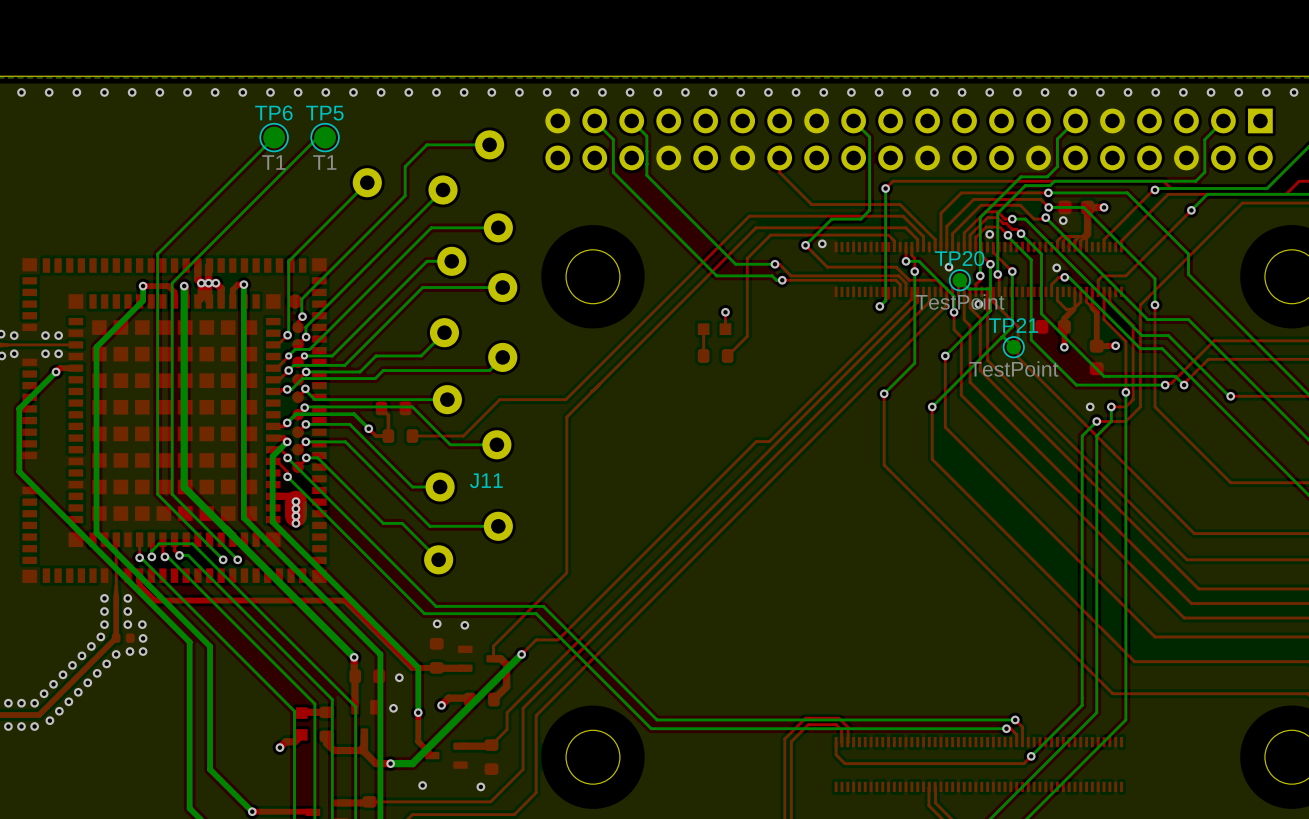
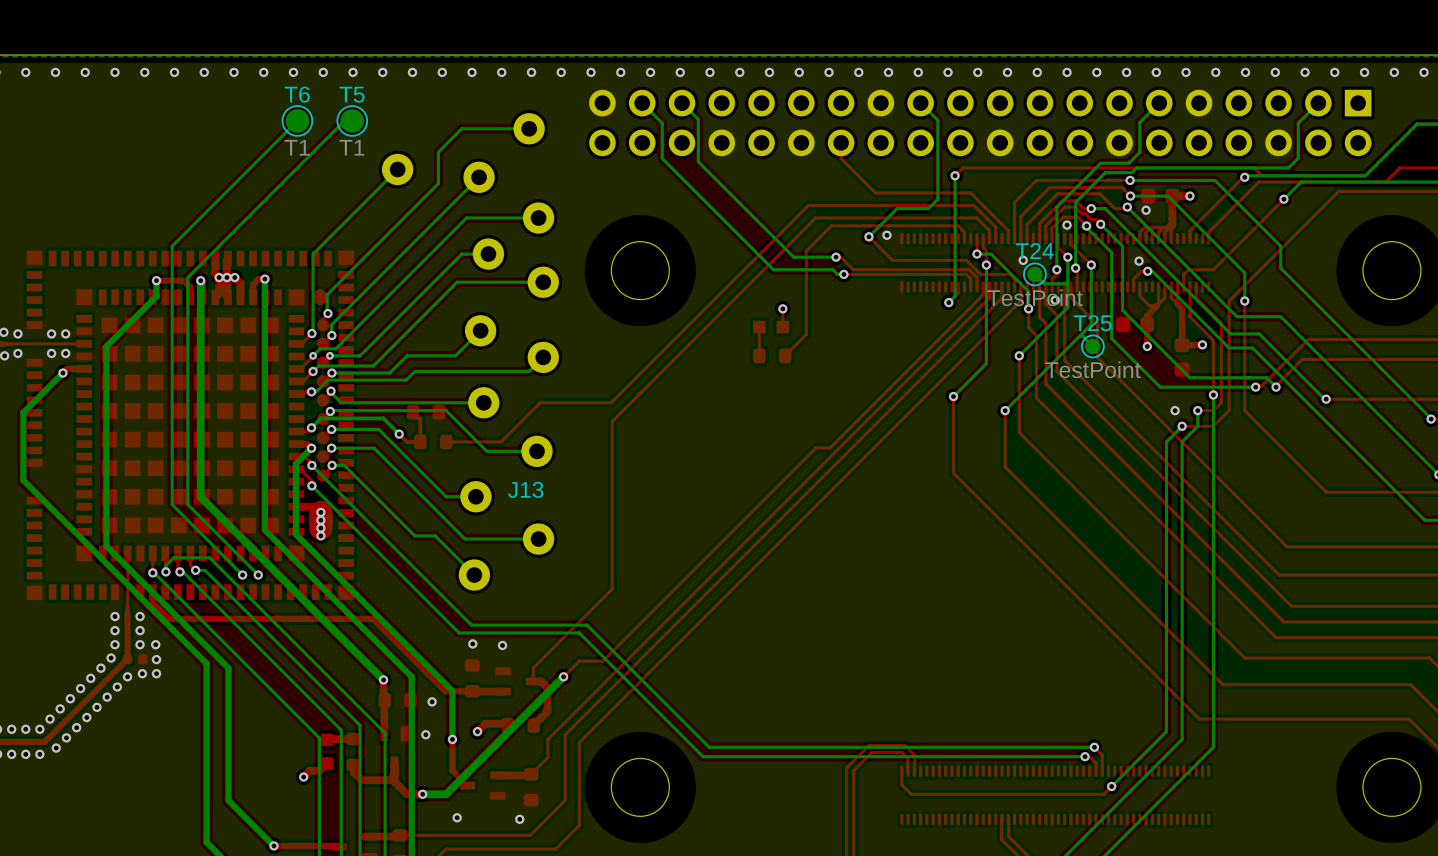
TP6 name: TP6 (273, 113) -> T6 (297, 94)
TP5 name: TP5 (324, 113) -> T5 (352, 94)
TP20 name: TP20 (959, 258) -> T24 (1034, 251)
TP21 name: TP21 (1013, 325) -> T25 (1092, 323)
J11 name: J11 (486, 480) -> J13 (525, 489)

